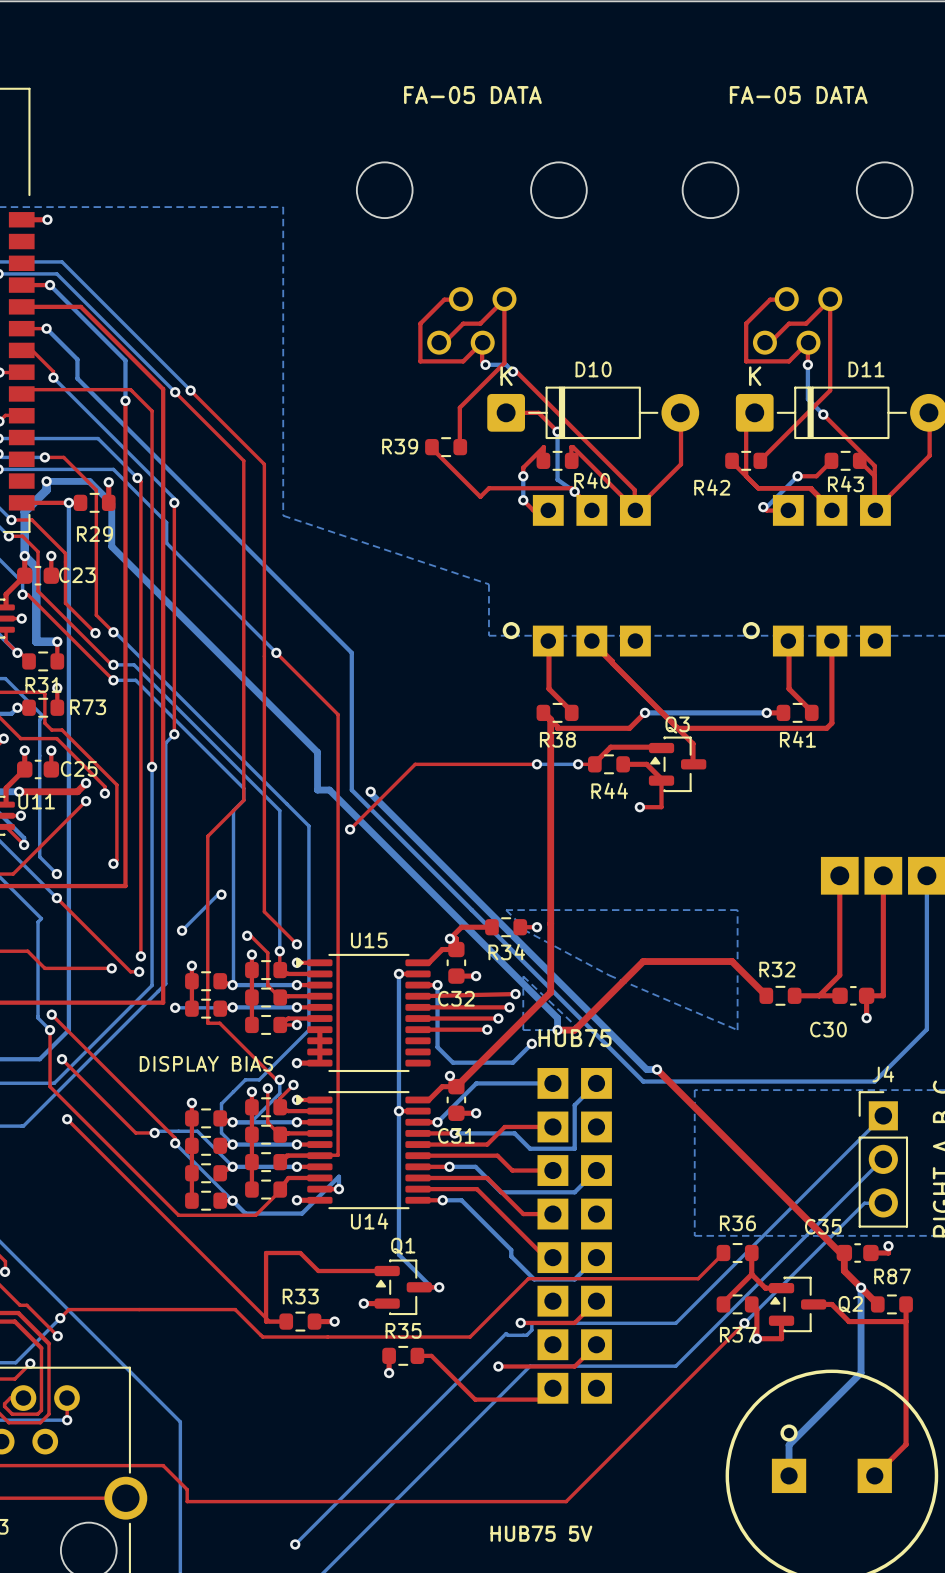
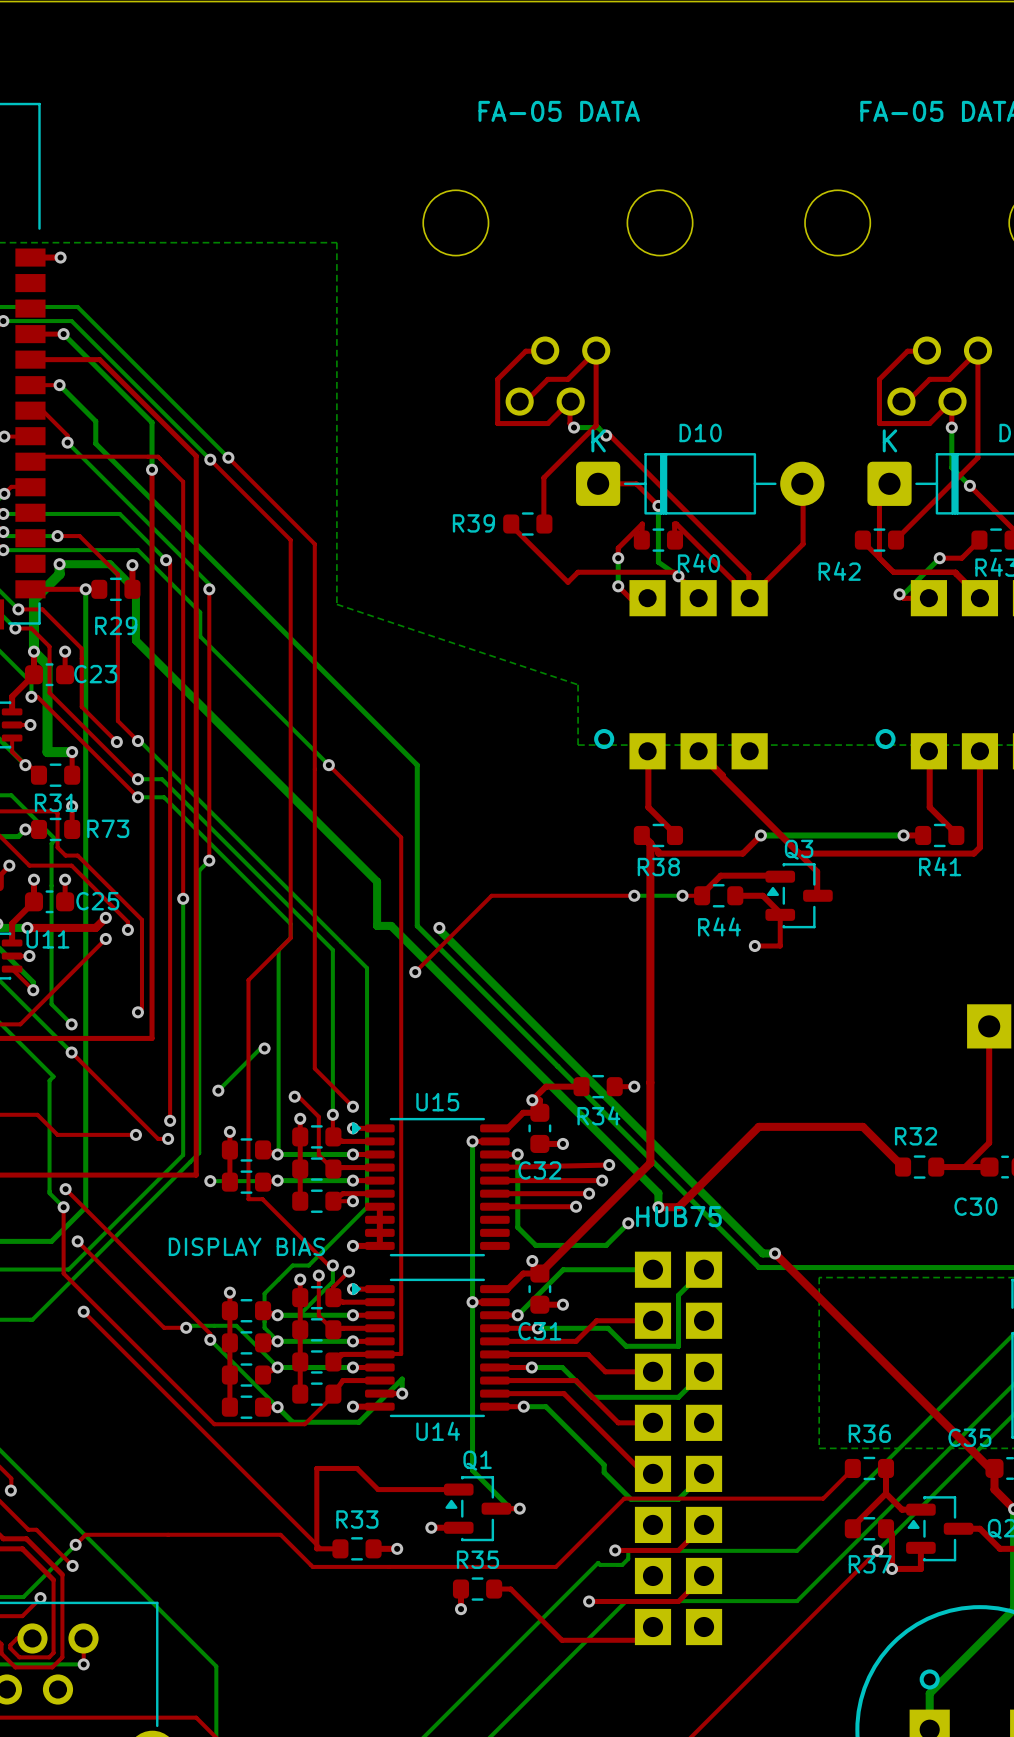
bottom zone outline: (506, 910) (737, 910) (737, 1030) (609, 975) (523, 929) (523, 927) (506, 910) -> none
bottom zone outline: (523, 976) (579, 1030) (523, 1030) (523, 976) -> none

